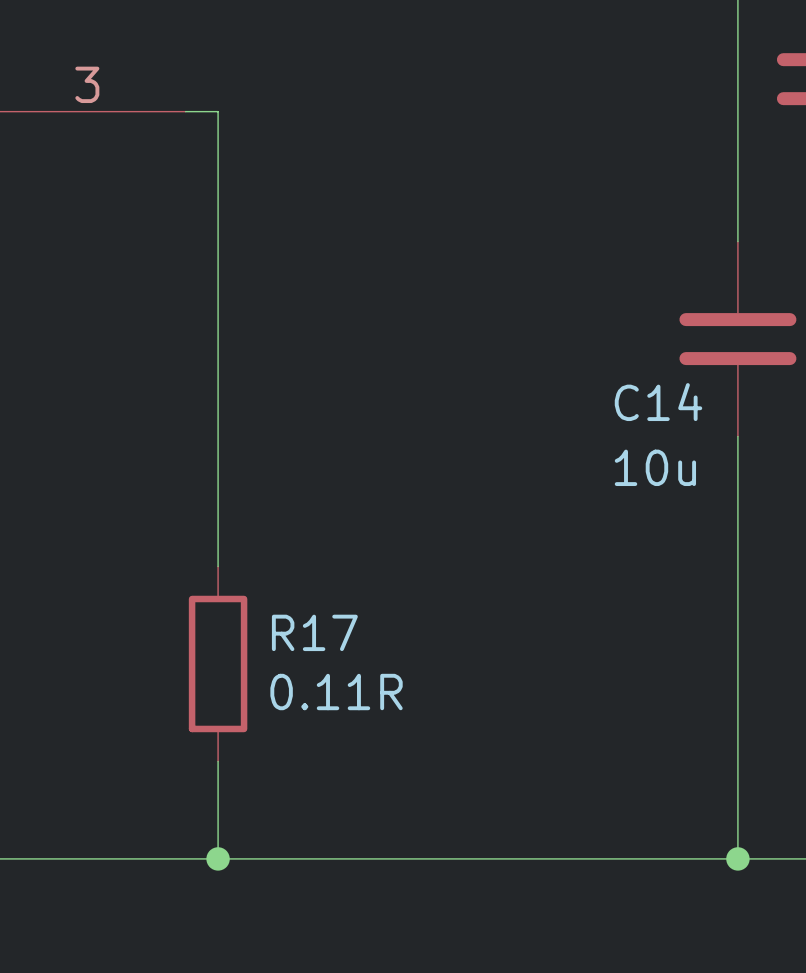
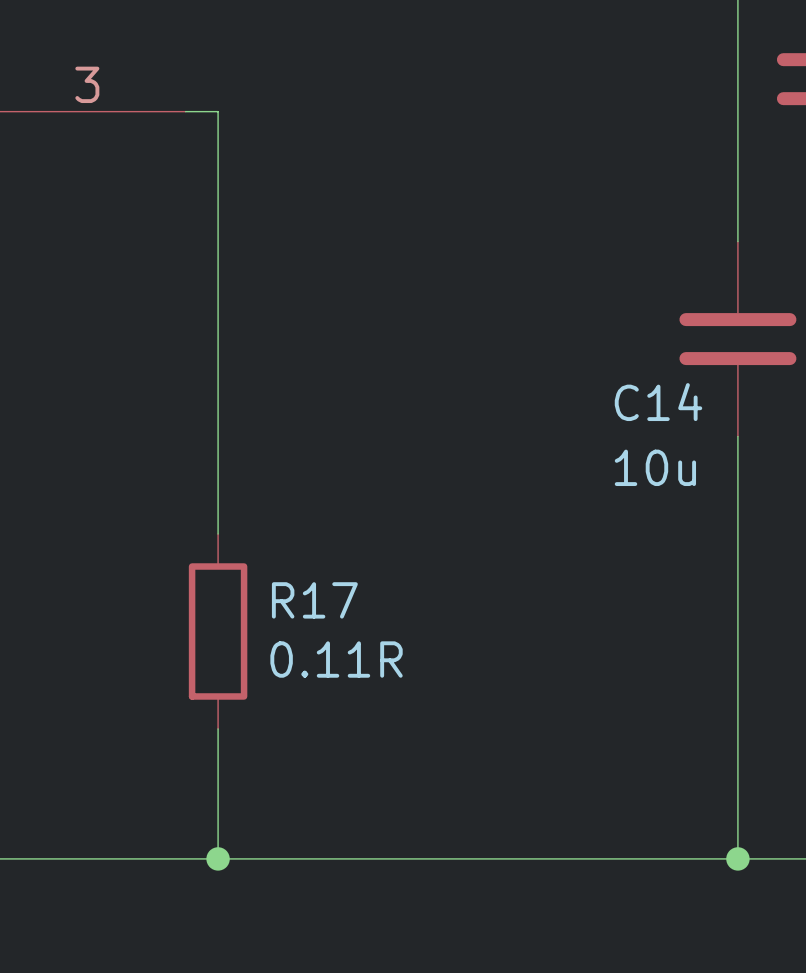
R17 position: (218, 663) -> (218, 631)

